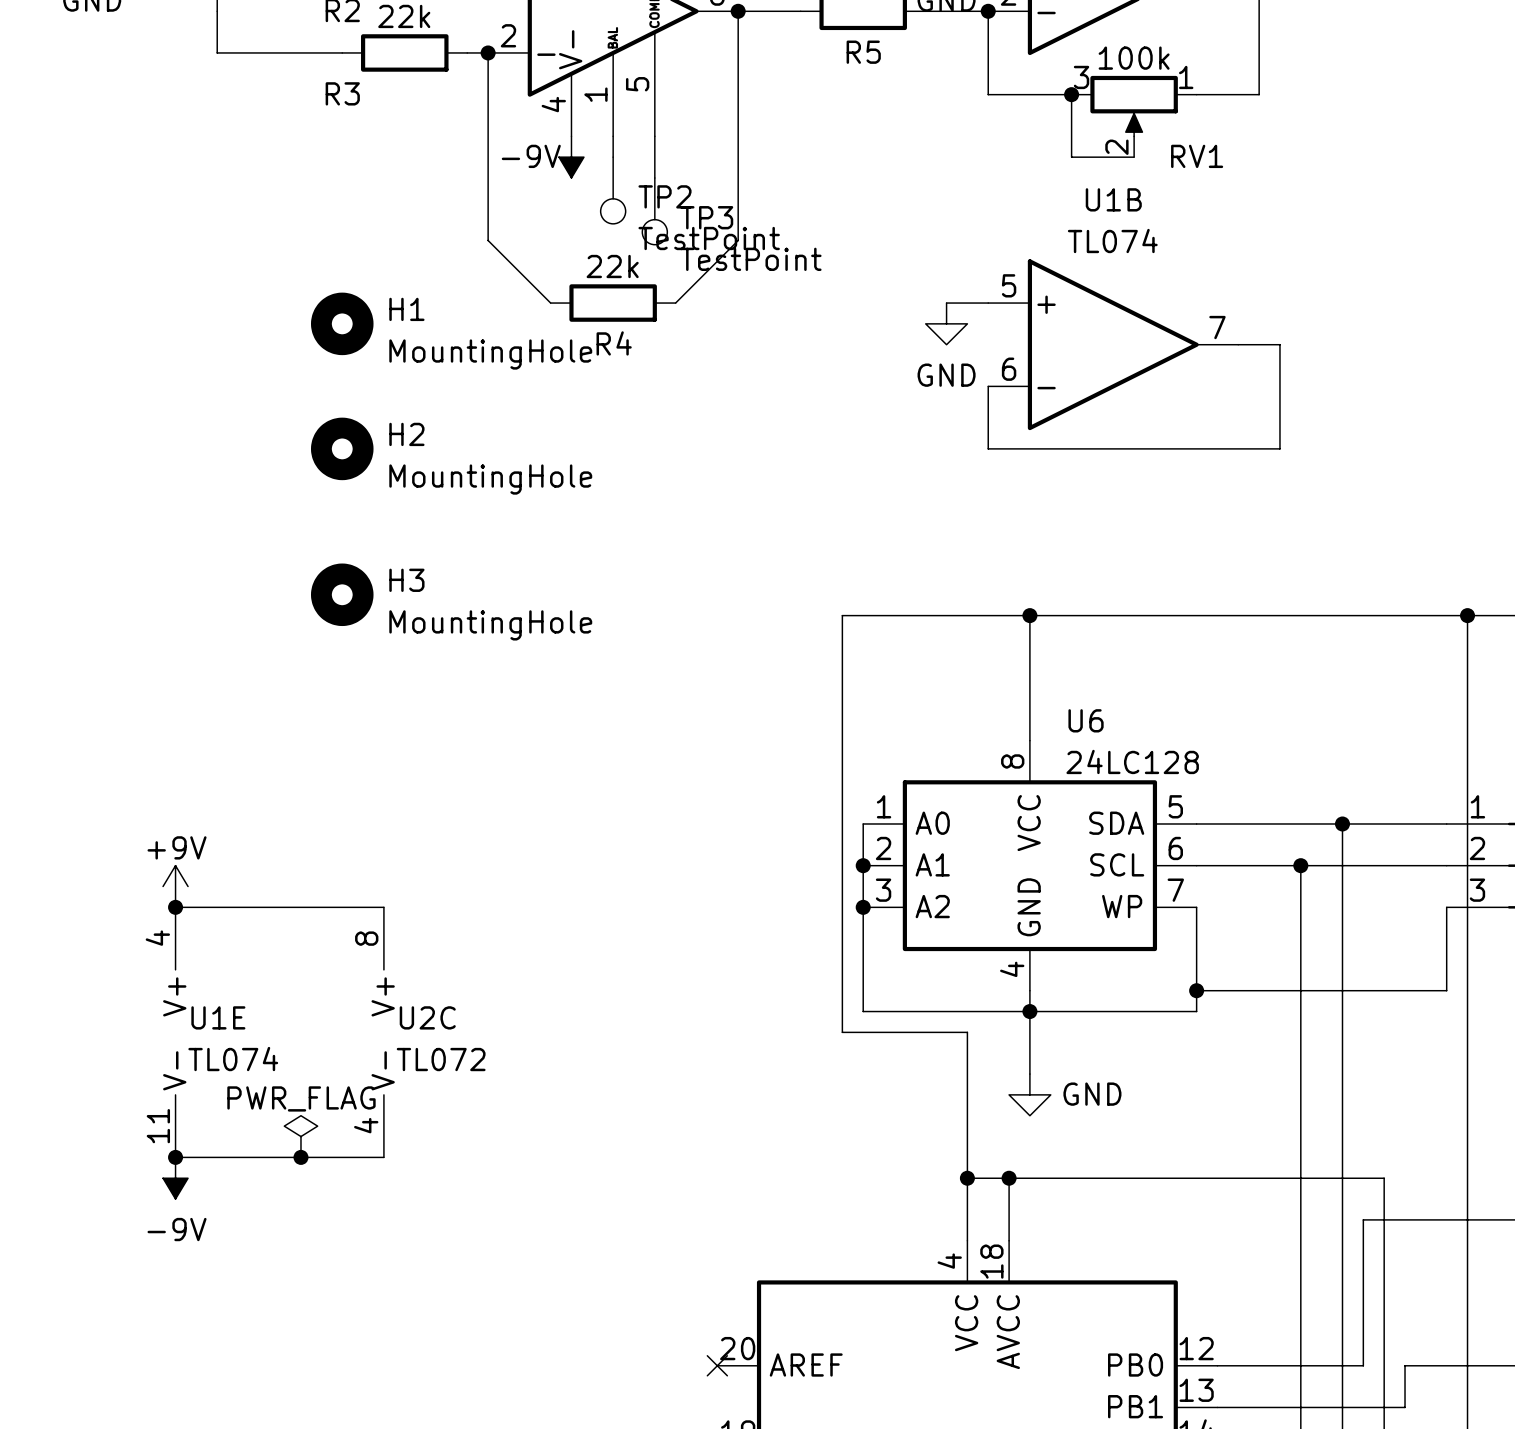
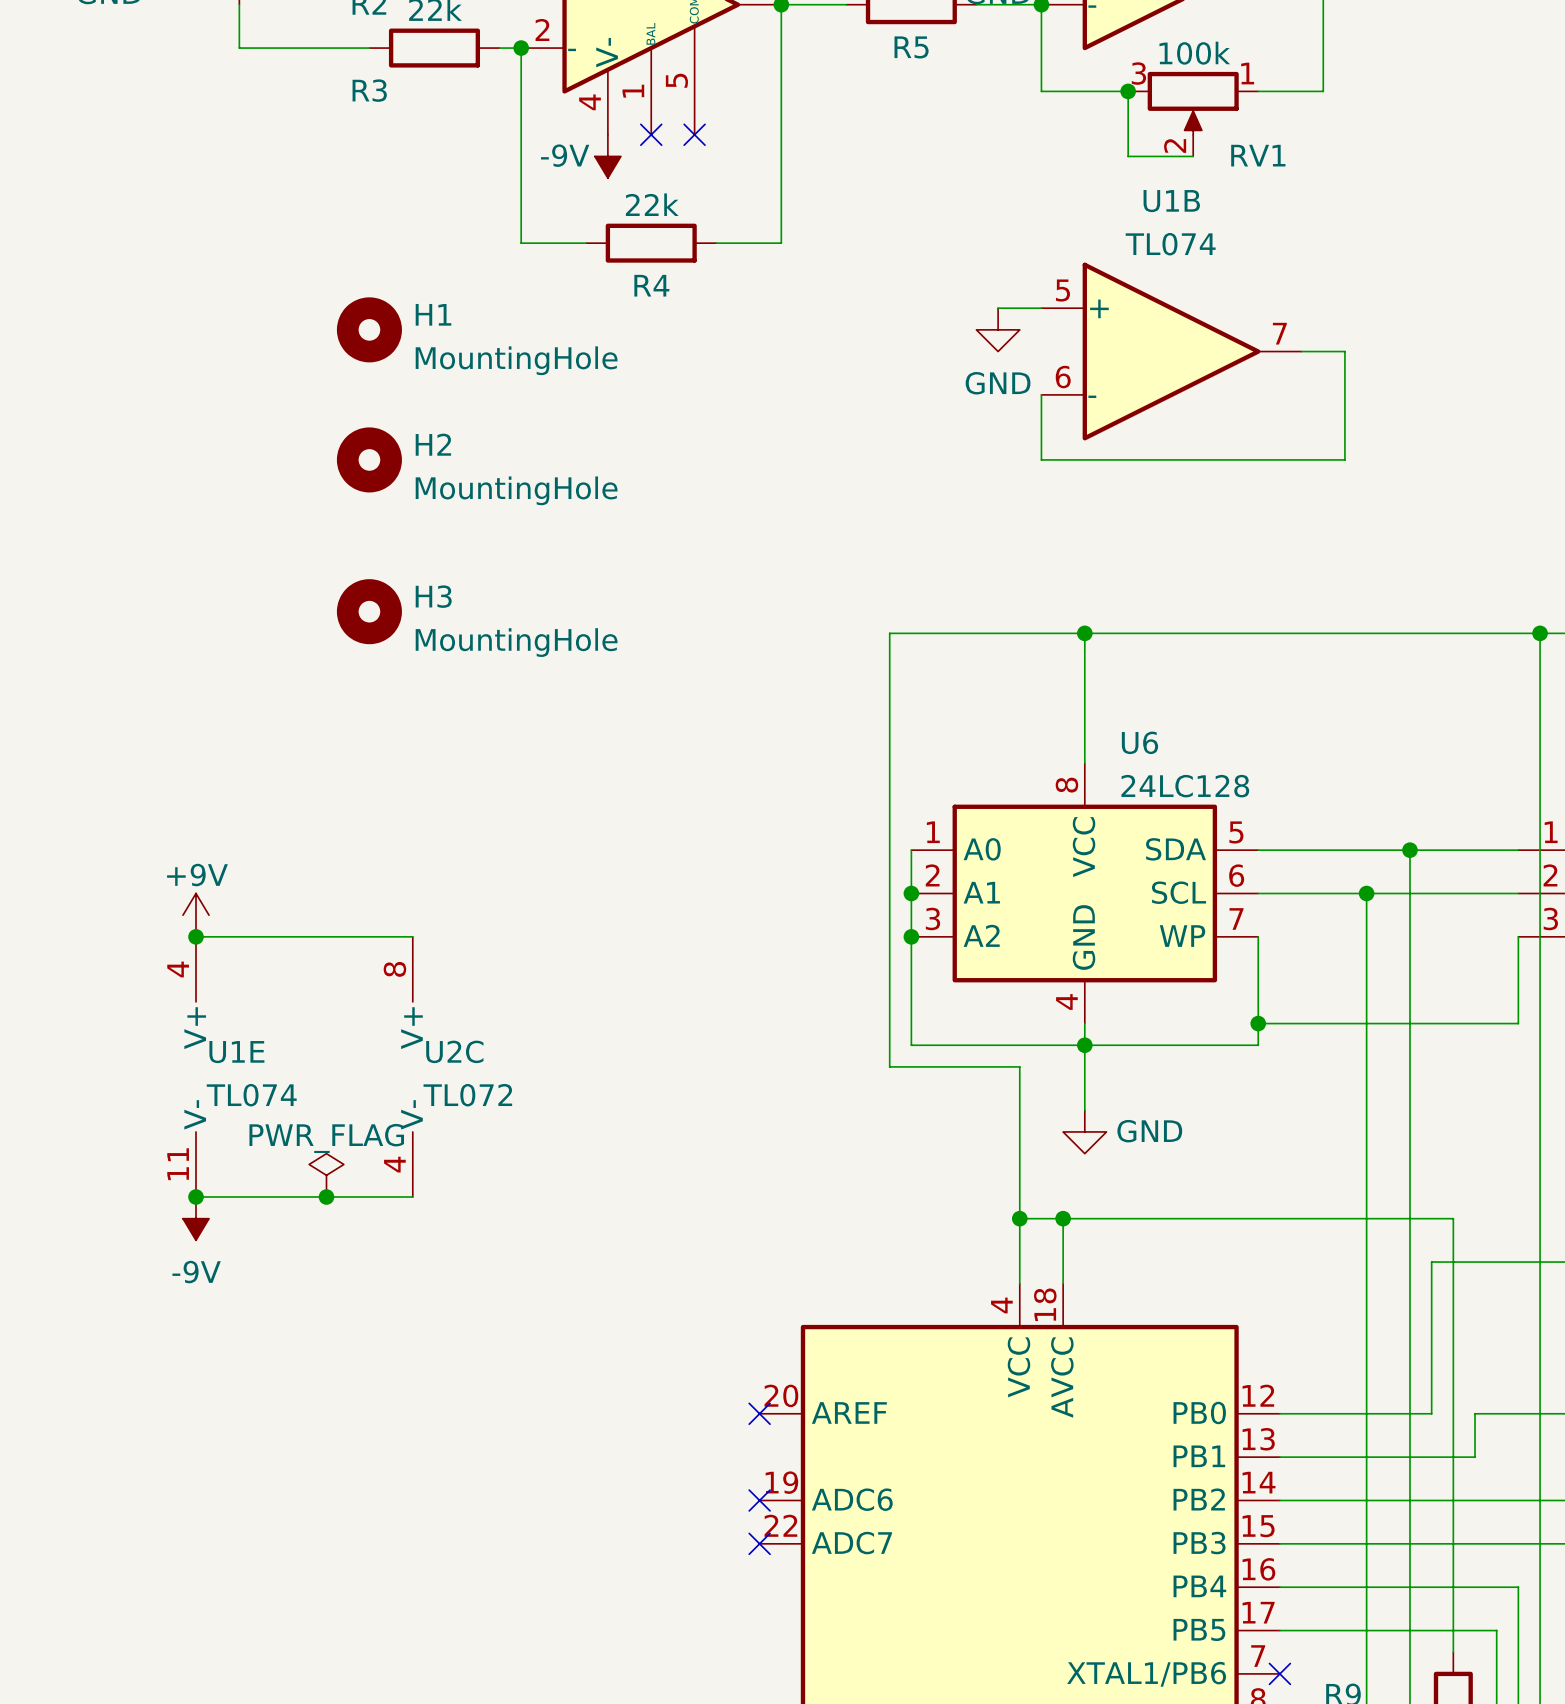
wire: (613, 136) (613, 157) -> none
no-connect mark: none -> (651, 134)
wire: (654, 136) (654, 178) -> none
no-connect mark: none -> (694, 134)
TP2: TestPoint (613, 190) -> none
TP3: TestPoint (654, 211) -> none
wire: (488, 240) (550, 303) -> (521, 243) (586, 243)
wire: (738, 240) (675, 303) -> (781, 243) (716, 243)
R4 position: (613, 303) -> (651, 243)

